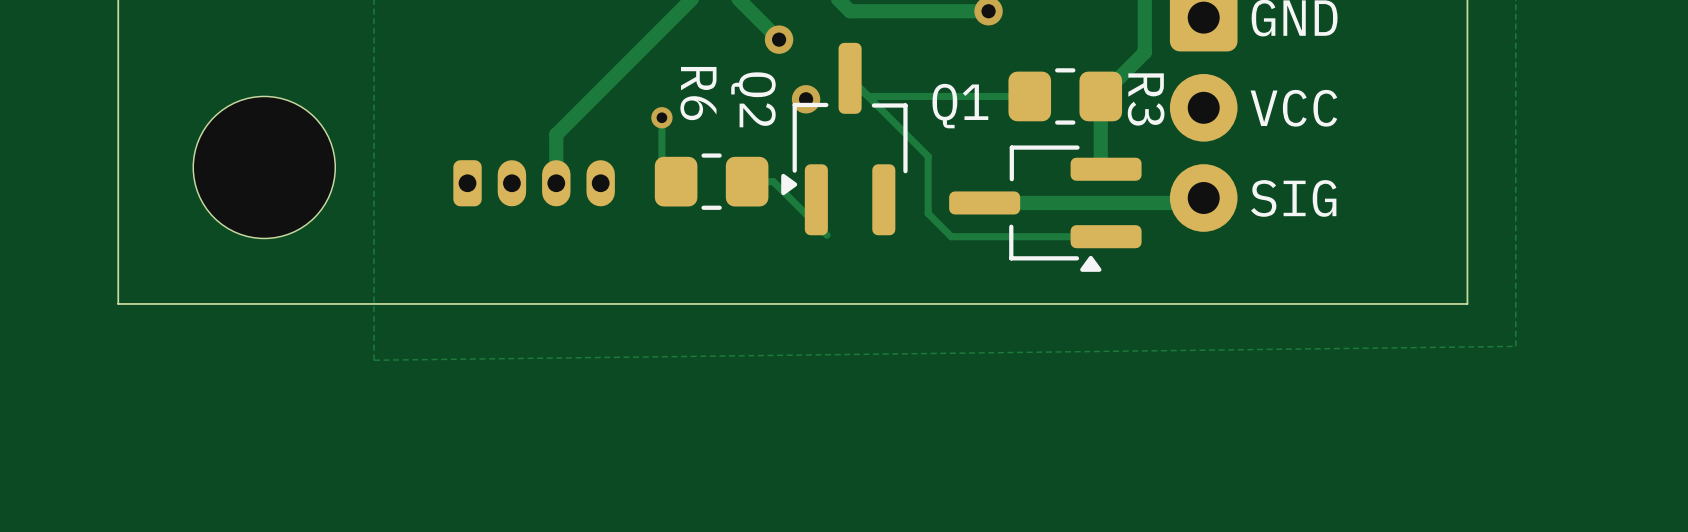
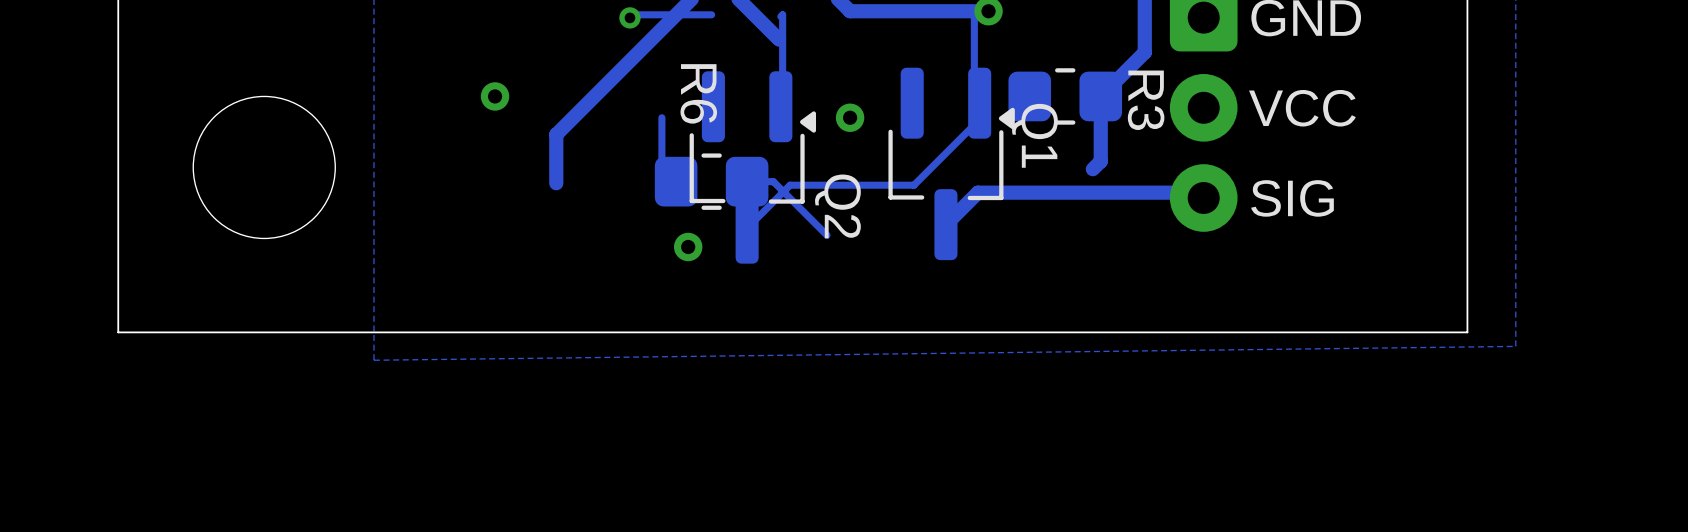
track: none -> (711, 14) (633, 14) (629, 17)
track: none -> (974, 14) (974, 97) (979, 103) (979, 119) (914, 185) (790, 185) (747, 228)
track: none -> (780, 16) (782, 14) (782, 104) (780, 106)
via: (779, 39) -> none
track: (850, 78) (928, 156) (928, 213) (951, 236) (1106, 236) -> none
via: none -> (495, 96)
track: (868, 96) (1029, 96) (1029, 116) -> none
via position: (806, 99) -> (850, 117)
Q1 name position: Q1 (960, 106) -> Q1 (1034, 135)
via position: (661, 117) -> (629, 17)
Q2 rotation: 0° (844, 139) -> 180° (752, 167)
part: (534, 183) -> none
track: none -> (1208, 192) (977, 192) (945, 224)
track: (1203, 197) (1198, 202) (984, 202) -> none
Q1 rotation: 0° (1045, 208) -> 90° counterclockwise (951, 163)
via: none -> (688, 246)
board edge: (1467, 303) (118, 303) -> (1467, 303) (1467, 332) (118, 332) (118, 303)

